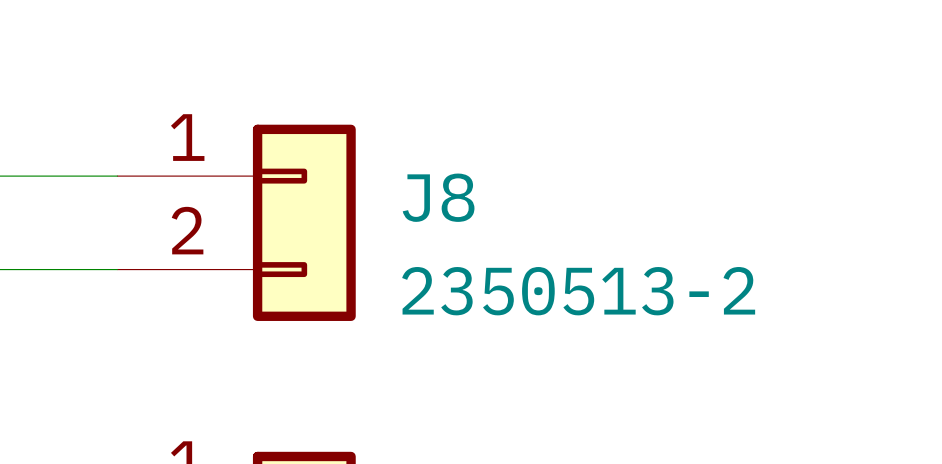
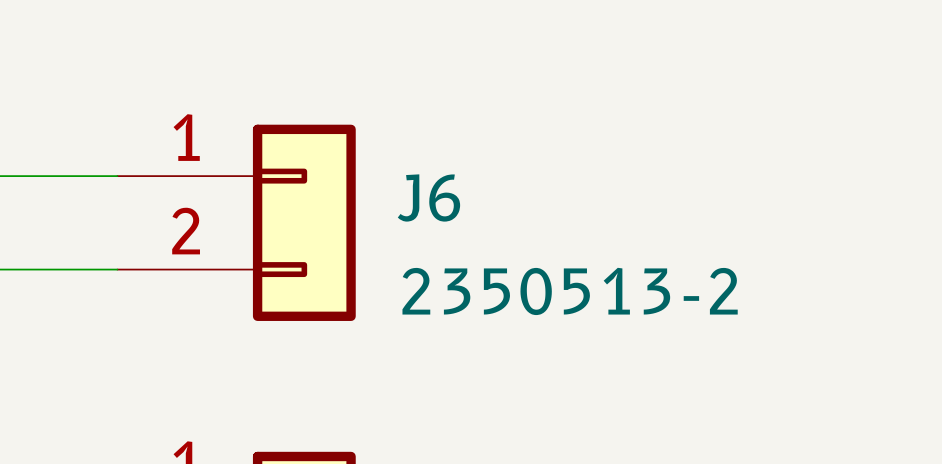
J8 name: J8 (438, 197) -> J6 (428, 197)

